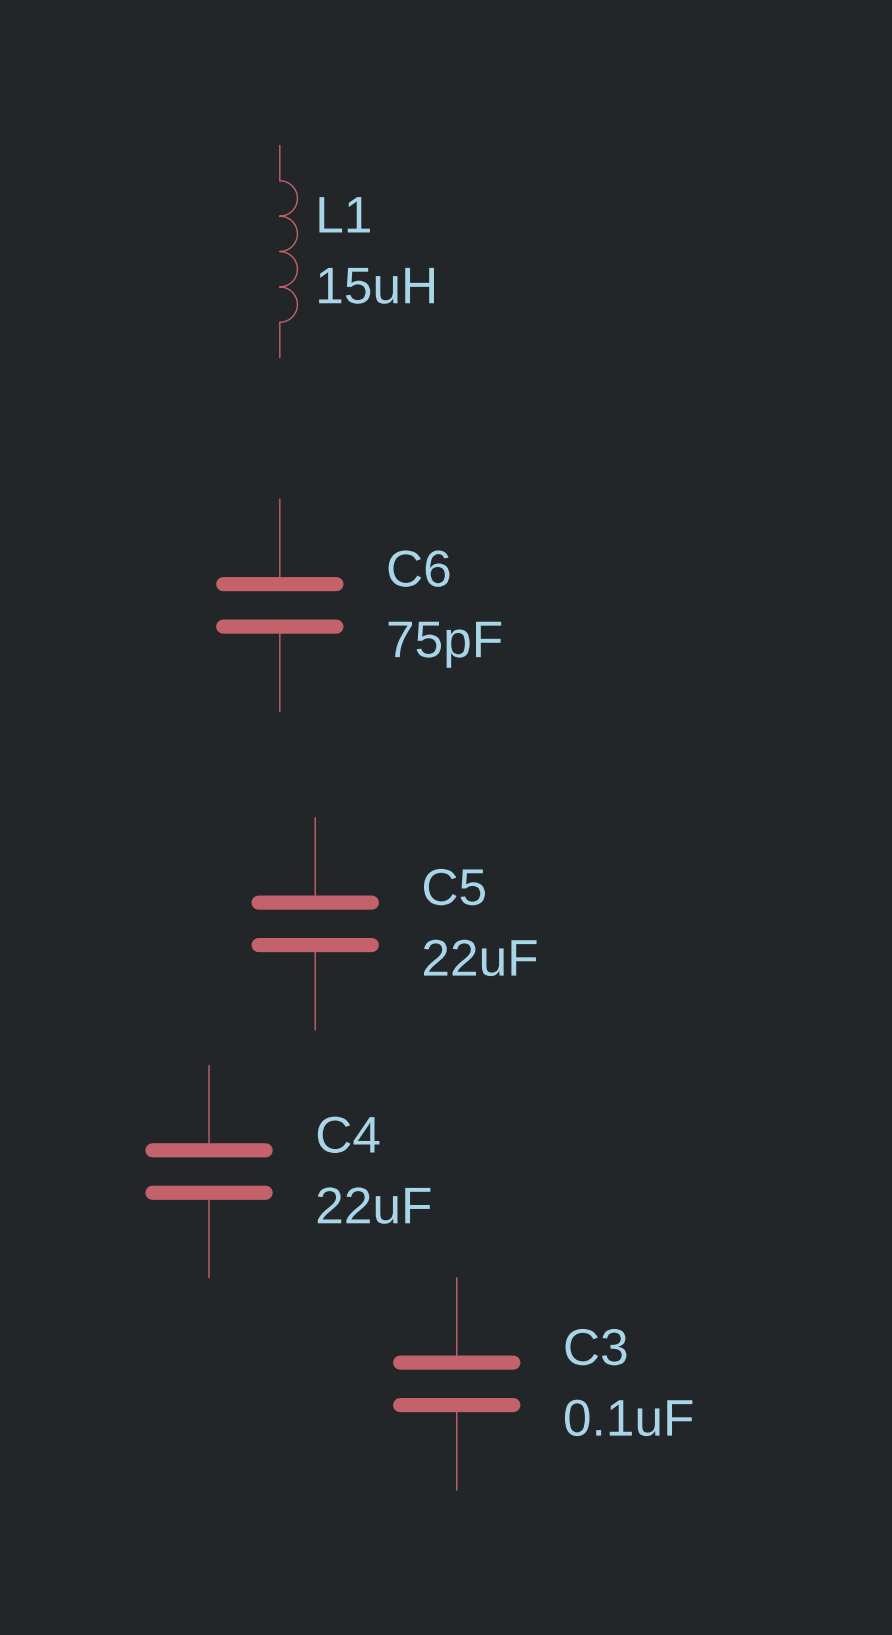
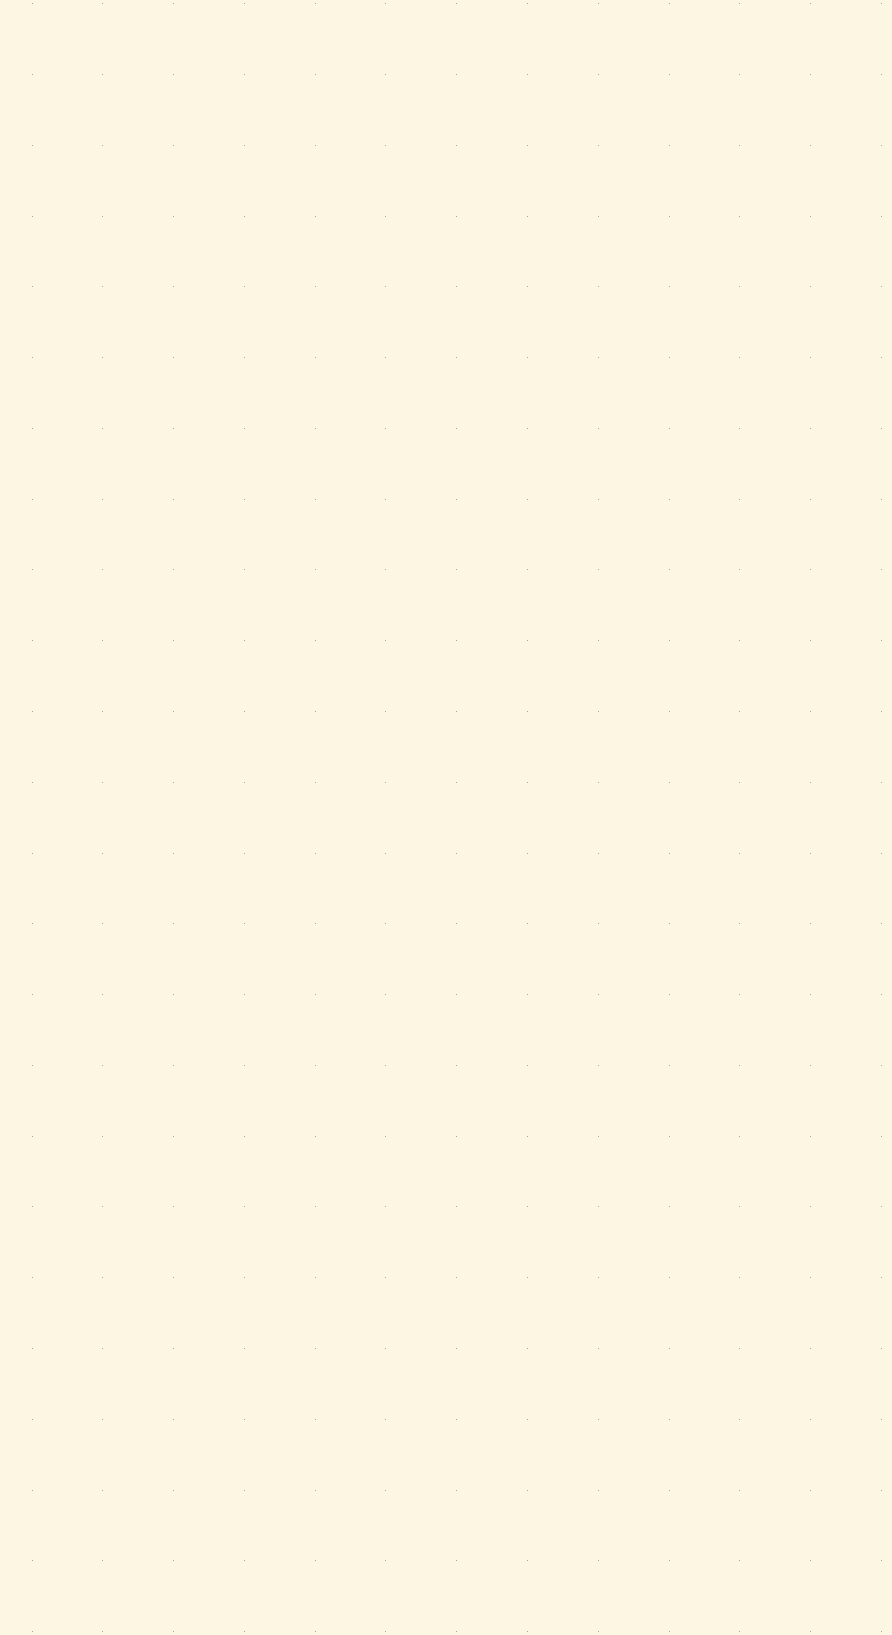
L1: 15uH (288, 251) -> none
C6: 75pF (279, 605) -> none
C5: 22uF (315, 923) -> none
C4: 22uF (209, 1171) -> none
C3: 0.1uF (456, 1383) -> none

